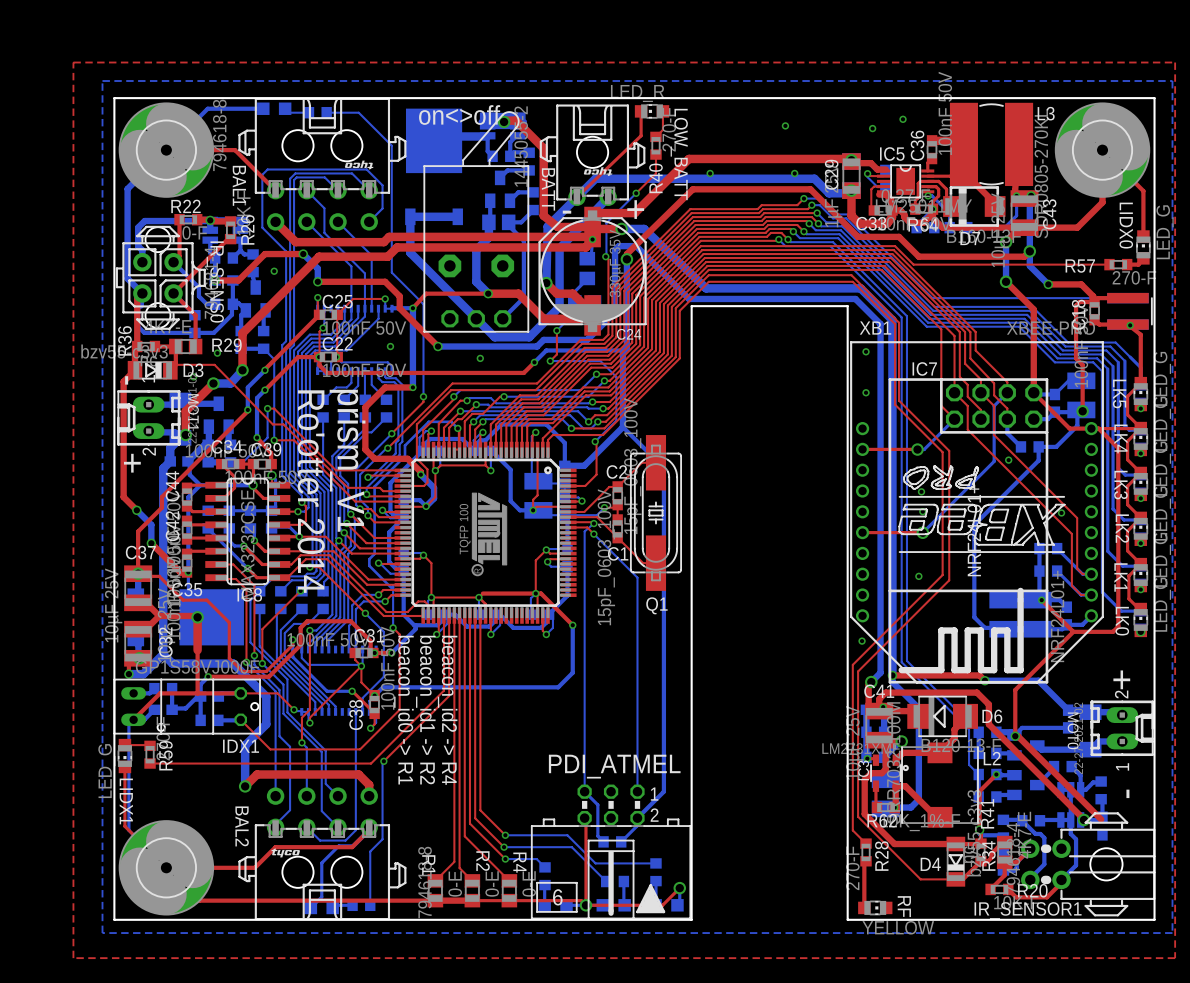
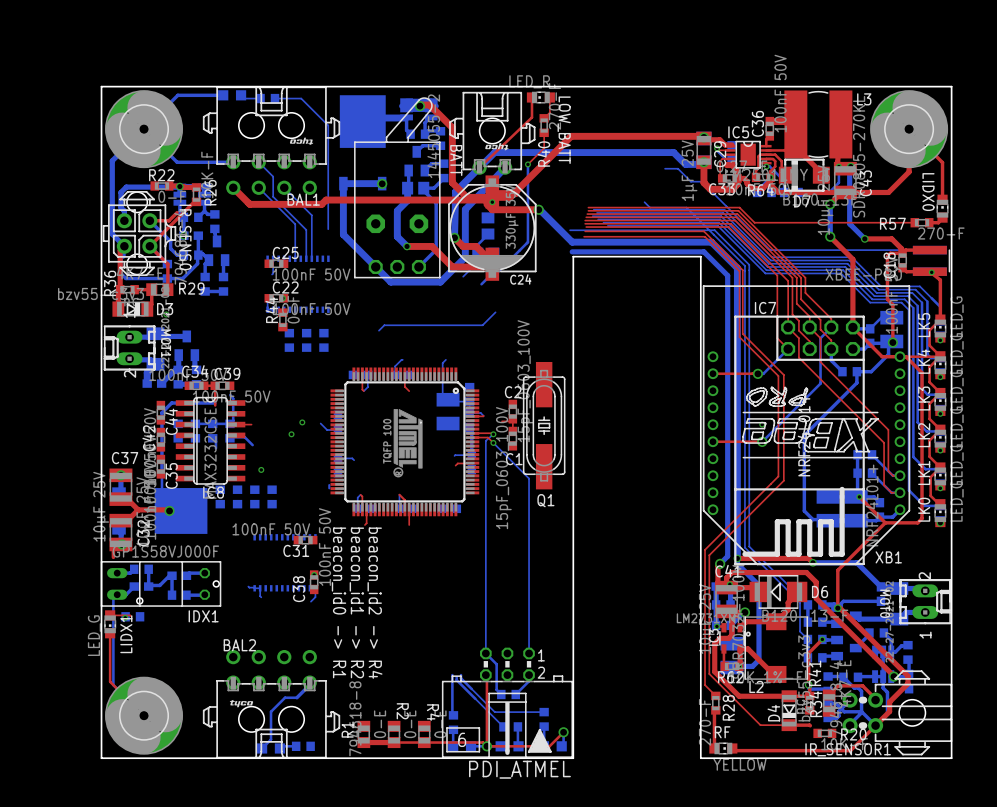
top zone outline: (73, 62) (73, 958) (1175, 958) (1175, 62) (73, 62) -> none
bottom zone outline: (102, 81) (102, 933) (1172, 933) (1172, 81) (102, 81) -> none
text: on<>off (459, 115) -> none
via: (903, 119) -> none
via: (785, 125) -> none
via: (872, 128) -> none
BAL1 value: 794618-8 (219, 135) -> none
bottom track: none -> (144, 129) (177, 162) (233, 162)
top track: (166, 150) (235, 150) (275, 190) -> none
via: (710, 173) -> none
via: (794, 173) -> none
C29 name position: C29 (831, 174) -> C29 (720, 154)
BAL1 name rotation: 0° (239, 185) -> 90° counterclockwise (303, 199)
BAL1 name position: BAL1 (239, 185) -> BAL1 (303, 199)
bottom track: (338, 190) (324, 177) (296, 177) (294, 180) (294, 345) (290, 349) (290, 473) (312, 495) (312, 564) (309, 567) -> none
bottom track: (369, 190) (352, 173) (295, 173) (290, 178) (290, 343) (286, 347) (286, 474) (308, 497) (308, 507) (304, 511) (298, 511) -> none
bottom track: (636, 193) (606, 223) (605, 256) -> (527, 164) (527, 242) (493, 276) (489, 276) (481, 284)
top track: (803, 198) (797, 205) (761, 205) (757, 209) (690, 209) (612, 287) (612, 335) (604, 343) (582, 343) (535, 390) (451, 390) (416, 424) (416, 458) (427, 469) (427, 482) (424, 485) (402, 485) -> none
via: (803, 198) -> none
bottom track: (811, 205) (819, 205) (832, 218) (846, 218) (876, 248) -> (593, 209) (724, 209)
top track: (811, 205) (807, 209) (762, 209) (759, 213) (691, 213) (616, 288) (616, 337) (605, 347) (584, 347) (537, 395) (519, 395) (490, 424) (490, 449) -> none
via: (811, 205) -> none
text: + (635, 209) -> none
text: - (567, 212) -> none
top track: (634, 213) (596, 213) (593, 215) (592, 227) (557, 227) (543, 215) -> (526, 180) (510, 197) (467, 197) (452, 182)
bottom track: (817, 213) (826, 222) (844, 222) (875, 252) -> (597, 213) (723, 213)
top track: (817, 213) (764, 213) (760, 217) (692, 217) (620, 289) (620, 338) (607, 351) (585, 351) (538, 399) (521, 399) (495, 424) (495, 449) -> none
via: (817, 213) -> none
via: none -> (382, 183)
top track: (179, 219) (179, 256) (173, 262) -> (177, 212) (168, 220) (149, 220)
bottom track: (369, 221) (382, 208) (382, 185) (366, 169) (267, 169) (262, 174) (262, 227) (286, 251) (286, 341) (282, 345) (282, 475) (301, 495) (301, 502) -> none
bottom track: (809, 223) (815, 230) (840, 230) (871, 260) -> (598, 219) (720, 219)
top track: (809, 223) (806, 221) (766, 221) (762, 224) (695, 224) (628, 292) (628, 341) (609, 359) (588, 359) (541, 407) (523, 407) (506, 424) (506, 449) -> none
via: (809, 223) -> none
bottom track: (818, 223) (821, 226) (842, 226) (872, 256) -> (592, 216) (721, 216)
top track: (818, 223) (811, 217) (765, 217) (761, 221) (694, 221) (624, 291) (624, 339) (608, 355) (587, 355) (539, 403) (522, 403) (501, 424) (501, 449) -> none
via: (818, 223) -> none
bottom track: (621, 228) (644, 228) (706, 288) -> (538, 209) (572, 242) (585, 242)
via: (621, 228) -> none
bottom track: (793, 231) (799, 238) (838, 238) (868, 268) -> (607, 225) (717, 225)
top track: (793, 231) (790, 228) (769, 228) (765, 232) (698, 232) (636, 295) (636, 343) (612, 367) (591, 367) (543, 415) (527, 415) (516, 426) (516, 449) -> none
via: (793, 231) -> none
bottom track: (803, 231) (806, 234) (839, 234) (869, 264) -> (603, 222) (719, 222)
top track: (803, 231) (797, 224) (768, 224) (764, 228) (696, 228) (632, 293) (632, 342) (611, 363) (589, 363) (542, 411) (526, 411) (511, 426) (511, 449) -> none
via: (803, 231) -> none
LIDX0 value: LED_G (1165, 232) -> none
top track: (592, 239) (585, 247) (397, 247) (387, 256) (319, 256) (242, 333) (242, 370) -> none
top track: (778, 239) (700, 240) (644, 297) (644, 346) (609, 380) (604, 380) -> none
via: (778, 239) -> none
bottom track: (788, 239) (790, 242) (832, 242) (864, 273) -> (570, 230) (714, 230)
top track: (788, 239) (781, 232) (770, 232) (766, 236) (699, 236) (640, 296) (640, 345) (611, 374) (596, 374) -> none
via: (788, 239) -> none
top track: none -> (486, 204) (492, 209) (538, 209)
top track: (710, 246) (700, 246) (648, 298) (648, 347) (608, 387) (583, 387) (551, 419) (529, 419) (521, 426) (521, 449) -> none
via: none -> (538, 209)
top track: (710, 250) (702, 250) (652, 300) (652, 349) (609, 391) (584, 391) (552, 423) (530, 423) (527, 426) (527, 449) -> none
top track: (1029, 251) (1024, 256) (918, 256) (899, 236) (858, 236) (810, 189) (692, 189) (626, 254) (626, 259) -> none
via: (1029, 251) -> none
bottom track: (410, 252) (494, 337) -> (343, 213) (343, 234) (390, 282) (412, 282)
bottom track: (303, 254) (317, 268) (317, 281) -> none
top track: (303, 254) (264, 254) (238, 280) (215, 280) -> none
via: (303, 254) -> none
top track: (708, 254) (703, 254) (655, 301) (655, 350) (611, 395) (585, 395) (542, 438) (542, 449) -> none
top track: (605, 256) (608, 259) (608, 334) (603, 339) (580, 339) (537, 383) (452, 383) (387, 448) -> none
via: (605, 256) -> none
top track: (707, 258) (704, 258) (659, 302) (659, 351) (609, 402) (592, 402) -> none
bottom track: (626, 259) (626, 347) (622, 351) -> none
via: (626, 259) -> none
top track: (706, 261) (663, 304) (663, 353) (608, 408) (603, 408) -> none
top track: (707, 265) (667, 305) (667, 354) (607, 415) (595, 415) (588, 421) -> (586, 223) (585, 223)
top track: (708, 269) (671, 306) (671, 355) (605, 421) (597, 421) -> (587, 227) (586, 227)
via: (274, 271) -> none
bottom track: (391, 272) (423, 304) (423, 396) -> none
top track: (708, 275) (675, 308) (675, 357) (604, 428) (571, 428) -> (587, 231) (585, 231)
top track: (317, 281) (385, 281) (399, 296) (399, 308) (438, 346) -> none
via: (317, 281) -> none
top track: (708, 281) (679, 310) (679, 358) (603, 435) (552, 435) (547, 439) (547, 449) -> (587, 236) (584, 236)
top track: (488, 293) (426, 293) (412, 308) -> none
top track: (317, 297) (317, 313) (319, 314) (264, 370) -> none
via: (317, 297) -> none
top track: (385, 298) (353, 298) (337, 314) (336, 357) -> none
via: (385, 298) -> none
bottom track: (385, 299) (385, 308) (412, 308) (412, 387) -> none
bottom track: (344, 308) (344, 320) (331, 334) (309, 334) (294, 350) (294, 472) (316, 494) (316, 571) (304, 576) (274, 576) (250, 600) (250, 642) (287, 679) (287, 712) (325, 750) (325, 783) (338, 796) -> none
bottom track: (351, 308) (351, 319) (332, 338) (311, 338) (298, 351) (298, 470) (320, 493) (320, 573) (316, 577) (308, 577) (305, 580) (291, 580) (280, 591) -> none
bottom track: (358, 308) (358, 318) (333, 342) (312, 342) (301, 353) (301, 469) (324, 491) (324, 575) (317, 581) (311, 581) (300, 590) -> none
bottom track: (364, 308) (364, 316) (334, 346) (313, 346) (305, 354) (305, 468) (328, 490) (328, 577) (324, 582) (324, 595) (323, 591) -> none
bottom track: (378, 308) (378, 318) (346, 350) (315, 350) (309, 355) (309, 466) (332, 489) (332, 614) (316, 630) (309, 630) -> none
via: (412, 308) -> none
top track: (323, 328) (319, 331) (319, 357) -> none
via: (323, 328) -> none
XB1 name position: XB1 (875, 328) -> XB1 (888, 557)
bottom track: (880, 329) (880, 324) (855, 298) (689, 298) (636, 246) (618, 246) (615, 250) (615, 312) (587, 339) (543, 339) (537, 346) (438, 346) -> (727, 275) (703, 251) (572, 251)
top track: (556, 330) (556, 354) (550, 361) -> none
via: (556, 330) -> none
via: (390, 346) -> none
via: (438, 346) -> none
bottom track: (263, 348) (274, 359) (274, 440) -> none
bottom track: (622, 351) (546, 350) (534, 362) -> none
bottom track: (622, 351) (622, 427) -> none
via: (866, 351) -> none
via: (217, 353) -> none
top track: (319, 357) (319, 365) (327, 372) (523, 372) (534, 362) -> none
top track: (319, 357) (298, 357) (264, 390) -> none
via: (319, 357) -> none
via: (480, 358) -> none
bottom track: (550, 361) (600, 361) (616, 376) (616, 420) (595, 441) -> none
via: (550, 361) -> none
via: (534, 362) -> none
top track: (175, 364) (214, 364) (272, 424) (283, 424) (348, 487) (379, 487) (383, 491) (402, 491) -> none
top track: (135, 370) (123, 381) (123, 497) (136, 510) -> none
bottom track: (242, 370) (230, 383) (213, 383) -> none
via: (242, 370) -> none
bottom track: (264, 370) (247, 387) (247, 409) -> none
via: (264, 370) -> none
bottom track: (331, 371) (331, 362) (336, 357) (341, 362) (387, 362) (391, 366) (391, 371) -> none
bottom track: (351, 371) (351, 382) (346, 387) (336, 387) (323, 399) -> none
bottom track: (358, 371) (358, 385) (344, 399) -> none
bottom track: (364, 371) (365, 399) -> none
bottom track: (371, 371) (371, 384) (386, 399) -> none
bottom track: (378, 371) (378, 378) (382, 382) (394, 382) (398, 386) (398, 440) (395, 442) (395, 453) (371, 477) (368, 477) -> none
bottom track: (385, 371) (386, 378) (395, 378) (402, 384) (402, 441) (399, 444) (399, 454) (366, 487) (366, 494) -> none
via: (596, 374) -> none
text: - (126, 380) -> none
bottom track: (604, 380) (588, 396) (504, 396) -> none
via: (604, 380) -> none
top track: (213, 383) (185, 411) (185, 435) -> none
via: (213, 383) -> none
top track: (412, 387) (385, 387) (365, 407) (365, 449) (374, 458) (407, 458) (420, 472) (420, 474) -> none
via: (412, 387) -> none
bottom track: (264, 390) (257, 398) (257, 437) -> none
via: (264, 390) -> none
via: (866, 392) -> none
LK5 name rotation: 0° (1119, 393) -> 180° (924, 325)
top track: (423, 396) (423, 402) (391, 433) -> none
via: (423, 396) -> none
top track: (453, 396) (453, 399) (423, 430) (423, 449) -> none
via: (453, 396) -> none
top track: (504, 396) (500, 396) (482, 413) (472, 413) (464, 421) (464, 449) -> none
via: (504, 396) -> none
bottom track: (467, 400) (469, 398) (490, 398) (496, 403) (592, 402) -> none
top track: (467, 400) (460, 400) (438, 423) (438, 449) -> none
via: (467, 400) -> none
via: (592, 402) -> none
bottom track: (476, 404) (488, 404) (490, 407) (603, 408) -> none
top track: (476, 404) (461, 419) (457, 419) (449, 427) (449, 449) -> none
via: (476, 404) -> none
bottom track: (267, 408) (267, 437) (242, 462) (230, 462) -> none
top track: (267, 408) (274, 408) (335, 470) (402, 470) -> none
via: (267, 408) -> none
R44 side: bottom (323, 408) -> top (282, 319)
via: (603, 408) -> none
top track: (247, 409) (161, 497) (161, 507) (138, 531) (138, 573) -> none
via: (247, 409) -> none
bottom track: (460, 411) (578, 411) (588, 421) -> none
top track: (460, 411) (443, 427) (443, 449) -> none
via: (460, 411) -> none
bottom track: (323, 417) (323, 474) (336, 487) (336, 538) (338, 540) (336, 543) (336, 616) (308, 643) (308, 649) -> none
bottom track: (344, 417) (344, 444) (332, 456) (332, 478) (340, 486) (340, 528) (345, 532) (345, 545) (340, 551) (340, 617) (315, 642) (315, 649) -> none
bottom track: (365, 417) (365, 428) (336, 457) (336, 477) (344, 485) (344, 520) (350, 527) (350, 545) (344, 552) (344, 618) (322, 640) (322, 649) -> none
bottom track: (386, 417) (371, 432) (366, 432) (340, 458) (340, 475) (348, 483) (348, 511) (355, 518) (354, 547) (348, 553) (348, 619) (328, 639) (328, 649) -> none
bottom track: (473, 421) (480, 415) (570, 415) (583, 428) (591, 428) (597, 421) -> none
top track: (473, 421) (469, 425) (469, 449) -> none
via: (473, 421) -> none
bottom track: (482, 421) (485, 419) (562, 419) (571, 428) -> none
top track: (482, 421) (475, 429) (475, 449) -> none
via: (482, 421) -> none
via: (588, 421) -> none
via: (597, 421) -> none
bottom track: (622, 427) (663, 468) (663, 791) (637, 818) -> none
bottom track: (622, 427) (584, 465) (564, 465) (564, 442) (546, 424) (501, 424) (485, 440) (480, 440) (474, 450) (462, 438) (430, 438) (426, 442) (426, 450) (422, 450) -> none
bottom track: (457, 428) (451, 421) (428, 421) (405, 445) (405, 456) (374, 486) (374, 553) (369, 559) (369, 565) (393, 589) (393, 627) -> none
top track: (457, 428) (459, 449) (454, 449) -> none
via: (457, 428) -> none
via: (571, 428) -> none
bottom track: (431, 431) (426, 431) (419, 437) (419, 448) (422, 450) -> none
top track: (431, 431) (428, 434) (428, 449) -> none
via: (431, 431) -> none
top track: (482, 432) (480, 435) (480, 449) -> none
via: (482, 432) -> none
top track: (535, 432) (532, 435) (532, 449) -> none
via: (535, 432) -> none
bottom track: (391, 433) (356, 469) (356, 505) (360, 509) -> none
via: (391, 433) -> none
via: (185, 435) -> none
top track: (257, 437) (271, 453) (272, 483) (274, 485) (279, 485) -> none
via: (257, 437) -> none
LK4 name rotation: 0° (1120, 438) -> 180° (923, 361)
top track: (274, 440) (294, 440) (355, 501) (402, 501) -> none
via: (274, 440) -> none
top track: (595, 441) (596, 474) (585, 485) (568, 485) -> none
via: (595, 441) -> none
bottom track: (387, 448) (360, 474) (360, 499) (368, 507) (368, 515) -> none
via: (387, 448) -> none
top track: (537, 449) (537, 495) (533, 499) (533, 510) (536, 506) (568, 506) -> none
bottom track: (422, 450) (390, 482) (390, 511) (393, 514) (403, 514) (403, 517) (389, 532) (389, 561) (395, 568) (403, 568) (403, 614) (414, 625) (437, 625) (445, 617) (445, 614) -> none
text: prism_V1 (347, 460) -> none
via: (1008, 460) -> none
bottom track: (170, 461) (163, 468) (163, 654) -> none
bottom track: (187, 461) (189, 474) (200, 485) -> none
top track: (655, 462) (641, 462) (617, 486) (609, 486) (584, 511) (568, 511) -> none
text: + (132, 463) -> none
top track: (221, 464) (234, 476) (234, 487) (224, 498) (215, 498) -> none
top track: (485, 465) (440, 465) (435, 470) (435, 497) (425, 506) (402, 506) -> none
via: (435, 470) -> none
bottom track: (490, 470) (491, 450) (510, 469) (510, 501) (519, 510) (538, 510) (543, 515) (596, 515) (604, 507) -> none
via: (490, 470) -> none
bottom track: (420, 474) (434, 487) (434, 498) (426, 506) (419, 500) (403, 500) -> none
via: (420, 474) -> none
via: (272, 475) -> none
top track: (402, 475) (369, 475) (368, 477) -> none
via: (368, 477) -> none
top track: (215, 485) (190, 485) (187, 488) -> none
top track: (253, 485) (253, 488) (263, 498) (279, 498) -> none
via: (253, 485) -> none
LK3 name rotation: 0° (1120, 485) -> 180° (924, 398)
C44 name position: C44 (172, 486) -> C44 (171, 421)
text: Ro'otter 2014 (311, 491) -> none
via: (921, 491) -> none
top track: (366, 494) (368, 496) (402, 496) -> none
via: (366, 494) -> none
via: (582, 501) -> none
top track: (301, 502) (305, 506) (305, 520) (301, 524) (279, 524) -> none
via: (301, 502) -> none
top track: (187, 505) (192, 511) (215, 511) -> none
via: (426, 506) -> none
via: (604, 507) -> none
top track: (360, 509) (370, 509) (378, 517) (402, 517) -> none
bottom track: (136, 510) (151, 524) (151, 543) -> none
via: (136, 510) -> none
top track: (382, 510) (402, 511) -> none
via: (382, 510) -> none
via: (533, 510) -> none
via: (298, 511) -> none
via: (1061, 512) -> none
top track: (350, 514) (374, 537) (402, 537) -> none
via: (350, 514) -> none
top track: (368, 515) (374, 522) (402, 522) -> none
via: (368, 515) -> none
top track: (568, 517) (597, 517) (643, 563) (655, 563) -> none
top track: (187, 521) (190, 524) (215, 524) -> none
top track: (346, 523) (366, 543) (402, 543) -> none
bottom track: (208, 528) (247, 568) -> none
bottom track: (229, 528) (229, 540) (234, 545) (243, 545) -> none
LK2 name rotation: 0° (1122, 528) -> 180° (924, 435)
top track: (344, 532) (359, 548) (402, 548) -> none
via: (344, 532) -> none
via: (299, 536) -> none
top track: (215, 538) (187, 538) -> none
top track: (279, 538) (325, 536) (368, 579) (402, 579) -> none
top track: (254, 540) (264, 551) (333, 551) (367, 584) (402, 584) -> none
via: (254, 540) -> none
top track: (338, 540) (351, 553) (402, 553) -> none
via: (338, 540) -> none
top track: (151, 543) (180, 572) (187, 572) -> none
via: (151, 543) -> none
top track: (243, 545) (262, 564) (291, 564) (300, 555) (329, 555) (386, 612) (407, 612) (418, 601) (424, 601) (428, 605) (428, 615) -> none
via: (243, 545) -> none
via: (546, 549) -> none
top track: (215, 551) (190, 551) (187, 554) -> none
top track: (568, 553) (549, 553) (546, 549) (535, 560) (537, 615) -> none
via: (423, 555) -> none
top track: (402, 558) (419, 558) (423, 555) (431, 563) (431, 597) (478, 597) (482, 593) (541, 593) (572, 625) -> none
bottom track: (547, 561) (551, 566) (567, 566) (567, 595) (546, 616) (546, 622) (541, 627) (513, 627) (500, 614) -> none
via: (547, 561) -> none
bottom track: (378, 563) (390, 573) (402, 573) (403, 570) -> none
top track: (378, 563) (402, 563) -> none
via: (378, 563) -> none
top track: (215, 564) (233, 564) (254, 585) (254, 655) -> none
top track: (309, 567) (319, 567) (365, 613) -> none
top track: (247, 568) (257, 577) (287, 577) (305, 559) (327, 559) (383, 615) (423, 615) -> none
via: (247, 568) -> none
via: (188, 572) -> none
top track: (138, 573) (140, 576) (159, 576) (183, 600) (206, 600) (229, 622) (229, 658) (242, 671) (266, 671) (292, 645) (292, 639) -> none
via: (918, 576) -> none
top track: (215, 577) (235, 579) (246, 589) (246, 662) -> none
LK1 name rotation: 0° (1120, 577) -> 180° (924, 473)
C35 name rotation: 0° (187, 589) -> 90° counterclockwise (171, 475)
top track: (402, 589) (383, 589) (378, 594) -> none
top track: (300, 590) (262, 629) (262, 663) -> none
via: (300, 590) -> none
bottom track: (535, 593) (530, 598) (530, 614) -> none
via: (535, 593) -> none
bottom track: (378, 594) (362, 594) (352, 605) (352, 622) (349, 625) (349, 649) -> none
via: (378, 594) -> none
top track: (402, 595) (391, 595) (385, 601) -> none
via: (431, 597) -> none
via: (478, 597) -> none
bottom track: (385, 601) (363, 601) (355, 609) (355, 649) -> none
via: (385, 601) -> none
bottom track: (259, 608) (259, 646) (315, 701) (315, 711) -> none
bottom track: (280, 608) (276, 613) (276, 658) (322, 703) (322, 711) -> none
bottom track: (301, 608) (280, 630) (280, 656) (328, 704) (328, 711) -> none
bottom track: (323, 608) (308, 623) (294, 623) (284, 633) (284, 655) (335, 706) (335, 711) -> none
bottom track: (365, 613) (383, 631) (383, 676) (362, 698) (362, 711) -> none
via: (365, 613) -> none
bottom track: (445, 614) (455, 614) (467, 626) (489, 626) (494, 621) (494, 616) (500, 614) -> none
bottom track: (445, 614) (447, 623) (436, 634) -> none
bottom track: (500, 614) (500, 625) (490, 634) -> none
bottom track: (548, 614) (552, 614) (552, 627) (546, 634) -> none
top track: (443, 615) (443, 690) (371, 763) (150, 763) -> none
top track: (449, 615) (449, 695) (383, 761) -> none
top track: (454, 615) (454, 861) (435, 880) -> none
top track: (459, 615) (459, 868) (472, 880) -> none
top track: (464, 615) (464, 836) (509, 880) -> none
top track: (469, 615) (469, 823) (505, 859) -> none
top track: (475, 615) (475, 818) (504, 847) -> none
top track: (480, 615) (480, 810) (505, 835) -> none
top track: (542, 615) (542, 630) (546, 634) -> none
top track: (197, 617) (197, 693) -> none
LK0 name rotation: 0° (1122, 621) -> 180° (924, 509)
bottom track: (415, 625) (415, 629) (391, 652) -> none
bottom track: (572, 625) (572, 672) (558, 687) (382, 687) (369, 700) (369, 711) -> none
via: (572, 625) -> none
top track: (393, 627) (399, 634) (399, 709) (360, 749) (270, 749) (240, 719) -> none
via: (393, 627) -> none
top track: (309, 630) (309, 709) (301, 717) (301, 742) -> none
via: (309, 630) -> none
via: (436, 634) -> none
via: (490, 634) -> none
via: (546, 634) -> none
C31 name position: C31 (369, 635) -> C31 (296, 550)
bottom track: (292, 639) (292, 656) (327, 691) (352, 691) -> none
via: (292, 639) -> none
via: (862, 641) -> none
bottom track: (301, 649) (301, 658) (308, 664) (361, 666) (362, 649) -> none
top track: (355, 652) (355, 659) (361, 666) -> none
via: (374, 652) -> none
top track: (391, 652) (372, 652) (370, 650) (370, 641) (350, 621) (307, 621) (300, 627) (300, 645) (268, 676) (208, 676) -> none
via: (391, 652) -> none
bottom track: (163, 654) (143, 674) (128, 674) -> none
bottom track: (163, 654) (172, 663) (233, 663) (266, 696) (266, 724) (245, 745) (245, 786) -> none
bottom track: (254, 655) (254, 664) (279, 689) (279, 736) (290, 746) (290, 810) (275, 824) (275, 827) -> none
via: (254, 655) -> none
bottom track: (246, 662) (275, 691) (275, 796) -> none
via: (246, 662) -> none
bottom track: (262, 663) (283, 684) (283, 713) (321, 752) (321, 811) (338, 827) -> none
via: (262, 663) -> none
top track: (361, 666) (361, 682) (374, 695) -> none
top track: (361, 666) (309, 717) (309, 723) -> none
via: (361, 666) -> none
via: (128, 674) -> none
bottom track: (208, 676) (200, 684) (200, 696) -> none
via: (208, 676) -> none
text: + (1121, 679) -> none
top track: (352, 691) (374, 713) (374, 724) (370, 728) -> none
via: (352, 691) -> none
top track: (294, 709) (277, 693) (160, 693) (133, 719) -> none
via: (294, 709) -> none
bottom track: (355, 711) (355, 830) (345, 840) (320, 840) (306, 827) -> none
via: (309, 723) -> none
via: (370, 728) -> none
bottom track: (301, 742) (306, 747) (306, 796) -> none
via: (301, 742) -> none
via: none -> (125, 617)
R59 side: top (150, 754) -> bottom (132, 616)
L2 name position: L2 (992, 758) -> L2 (756, 686)
bottom track: (383, 761) (382, 839) (370, 851) (370, 905) -> none
via: (383, 761) -> none
PDI_ATMEL name position: PDI_ATMEL (614, 766) -> PDI_ATMEL (519, 769)
top track: (245, 786) (257, 774) (358, 774) (369, 784) (369, 796) -> none
via: (245, 786) -> none
text: - (1127, 793) -> none
LIDX1 name rotation: 0° (126, 801) -> 180° (126, 634)
bottom track: none -> (452, 675) (452, 714)
top track: none -> (907, 676) (907, 683) (889, 702) (889, 711) (850, 750) (732, 750)
BAL2 name rotation: 0° (242, 826) -> 90° counterclockwise (239, 645)
BAL2 name position: BAL2 (242, 826) -> BAL2 (239, 645)
top track: (369, 827) (369, 830) (352, 847) (275, 847) (254, 867) (166, 867) (199, 900) (435, 900) -> none
bottom track: (505, 835) (567, 835) -> (461, 675) (461, 678) (471, 689)
via: (505, 835) -> none
top track: (1004, 842) (991, 853) (991, 857) (987, 861) (980, 861) (962, 879) -> (810, 725) (794, 725)
top track: none -> (828, 695) (838, 685) (862, 685) (875, 700)
bottom track: (504, 847) (571, 847) -> (456, 677) (456, 680) (475, 698)
via: (504, 847) -> none
top track: (1030, 848) (1016, 862) (1004, 862) (1004, 875) (990, 889) -> none
bottom track: none -> (828, 703) (835, 703) (844, 711) (861, 711) (875, 725)
bottom track: (505, 859) (536, 859) (545, 867) -> none
via: (505, 859) -> none
D4 name rotation: 0° (930, 864) -> 90° counterclockwise (773, 713)
R1 name rotation: 0° (428, 865) -> 180° (347, 729)
top track: (1061, 879) (1061, 882) (1046, 897) (1016, 897) (1008, 889) -> none
RF name rotation: 0° (904, 906) -> 90° counterclockwise (722, 732)
RF name position: RF (904, 906) -> RF (722, 732)

